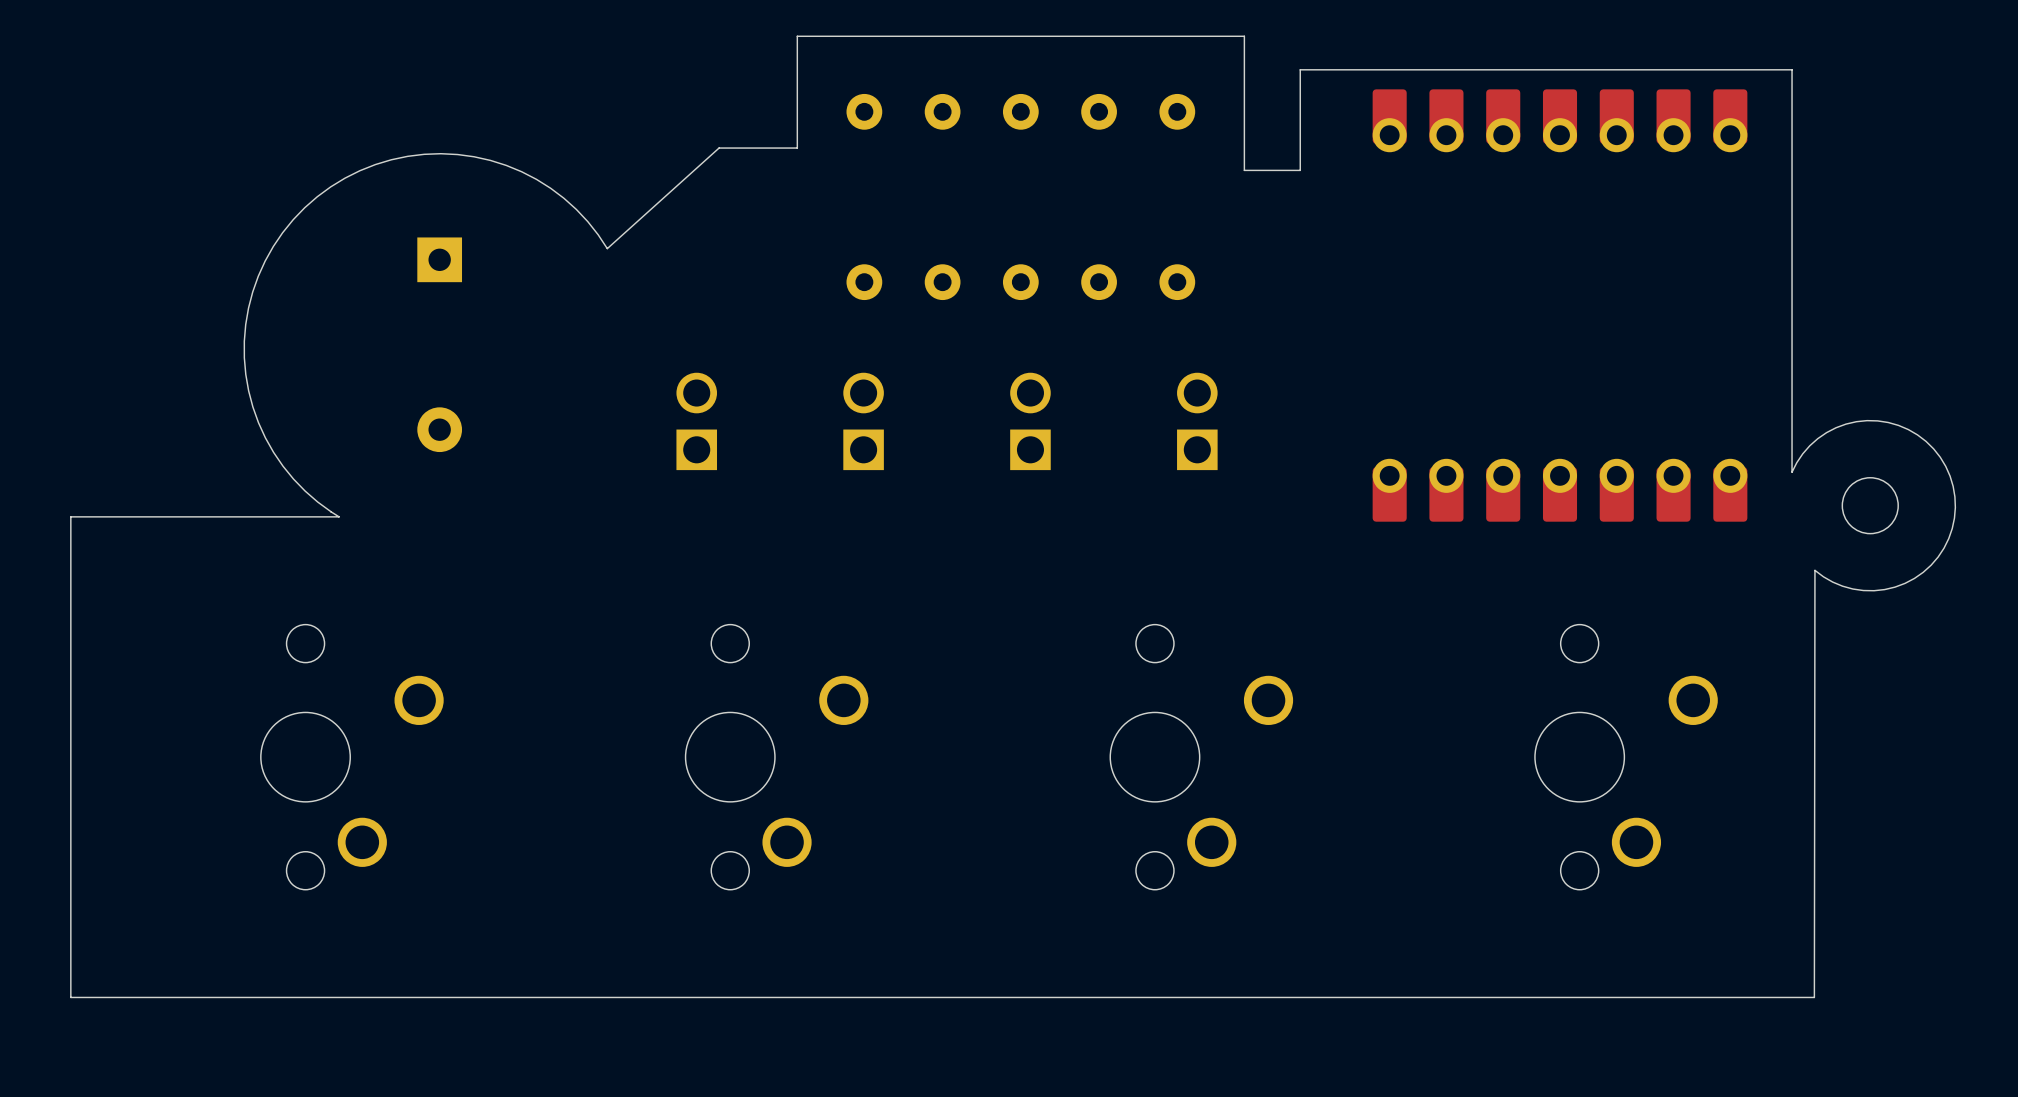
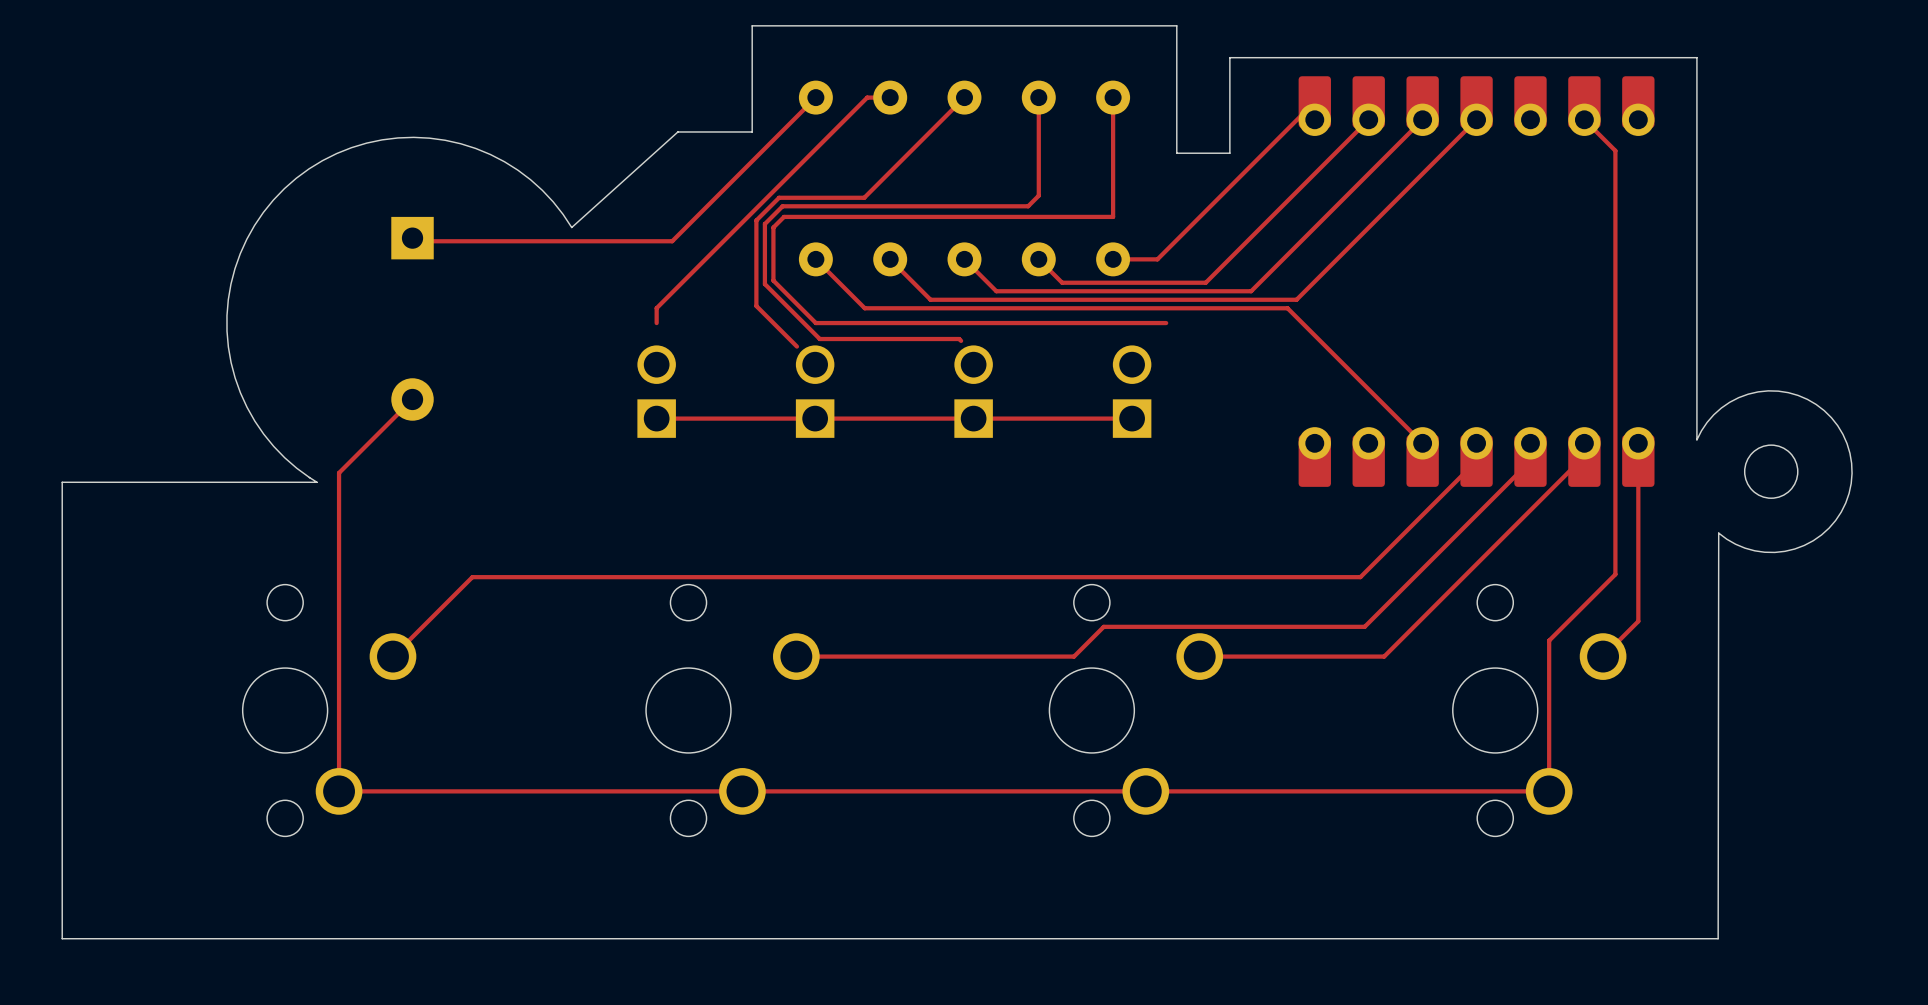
top track: none -> (815, 97) (672, 241) (415, 241) (412, 238)
top track: none -> (890, 97) (867, 97) (656, 308) (656, 323)
top track: none -> (964, 97) (864, 197) (779, 197) (756, 220) (756, 306) (796, 346)
top track: none -> (1038, 97) (1038, 195) (1028, 206) (782, 206) (764, 223) (764, 284) (819, 339) (959, 339) (961, 340)
top track: none -> (1113, 97) (1113, 216) (784, 216) (773, 227) (773, 280) (815, 323) (1166, 323)
top track: none -> (1314, 102) (1157, 259) (1113, 259)
top track: none -> (1368, 119) (1205, 282) (1062, 282) (1038, 259)
top track: none -> (1422, 119) (1251, 291) (996, 291) (964, 259)
top track: none -> (1476, 119) (1296, 299) (930, 299) (890, 259)
top track: none -> (1584, 119) (1615, 150) (1615, 574) (1549, 640) (1549, 791) (339, 791) (339, 472) (412, 399)
top track: none -> (815, 259) (864, 308) (1287, 308) (1422, 443) (1422, 466)
top track: none -> (1132, 418) (656, 418)
top track: none -> (1584, 443) (1584, 456) (1384, 656) (1199, 656)
top track: none -> (1638, 443) (1638, 621) (1603, 656)
top track: none -> (1476, 461) (1360, 577) (472, 577) (392, 656)
top track: none -> (1530, 461) (1364, 626) (1103, 626) (1074, 656) (796, 656)

